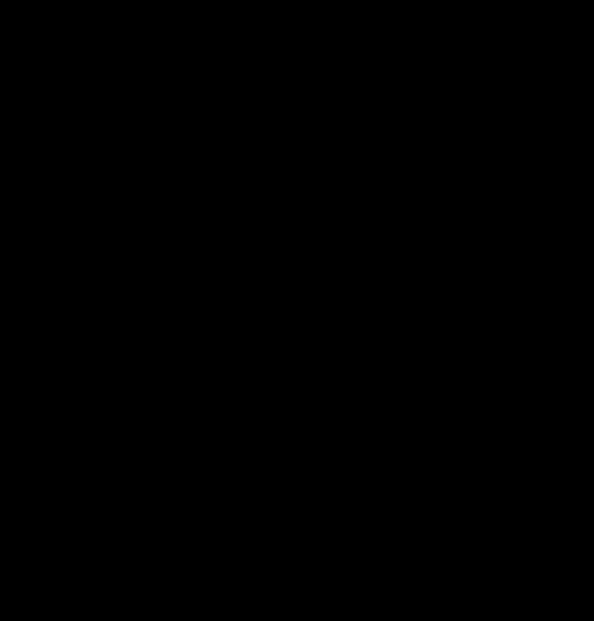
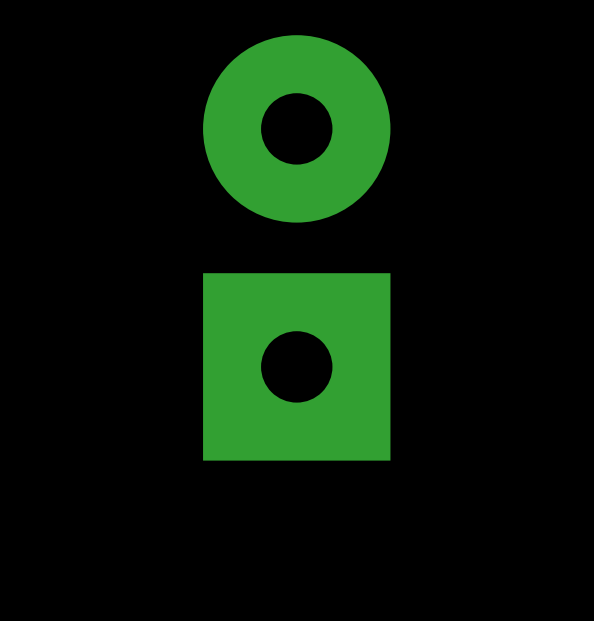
part: none -> (296, 247)

